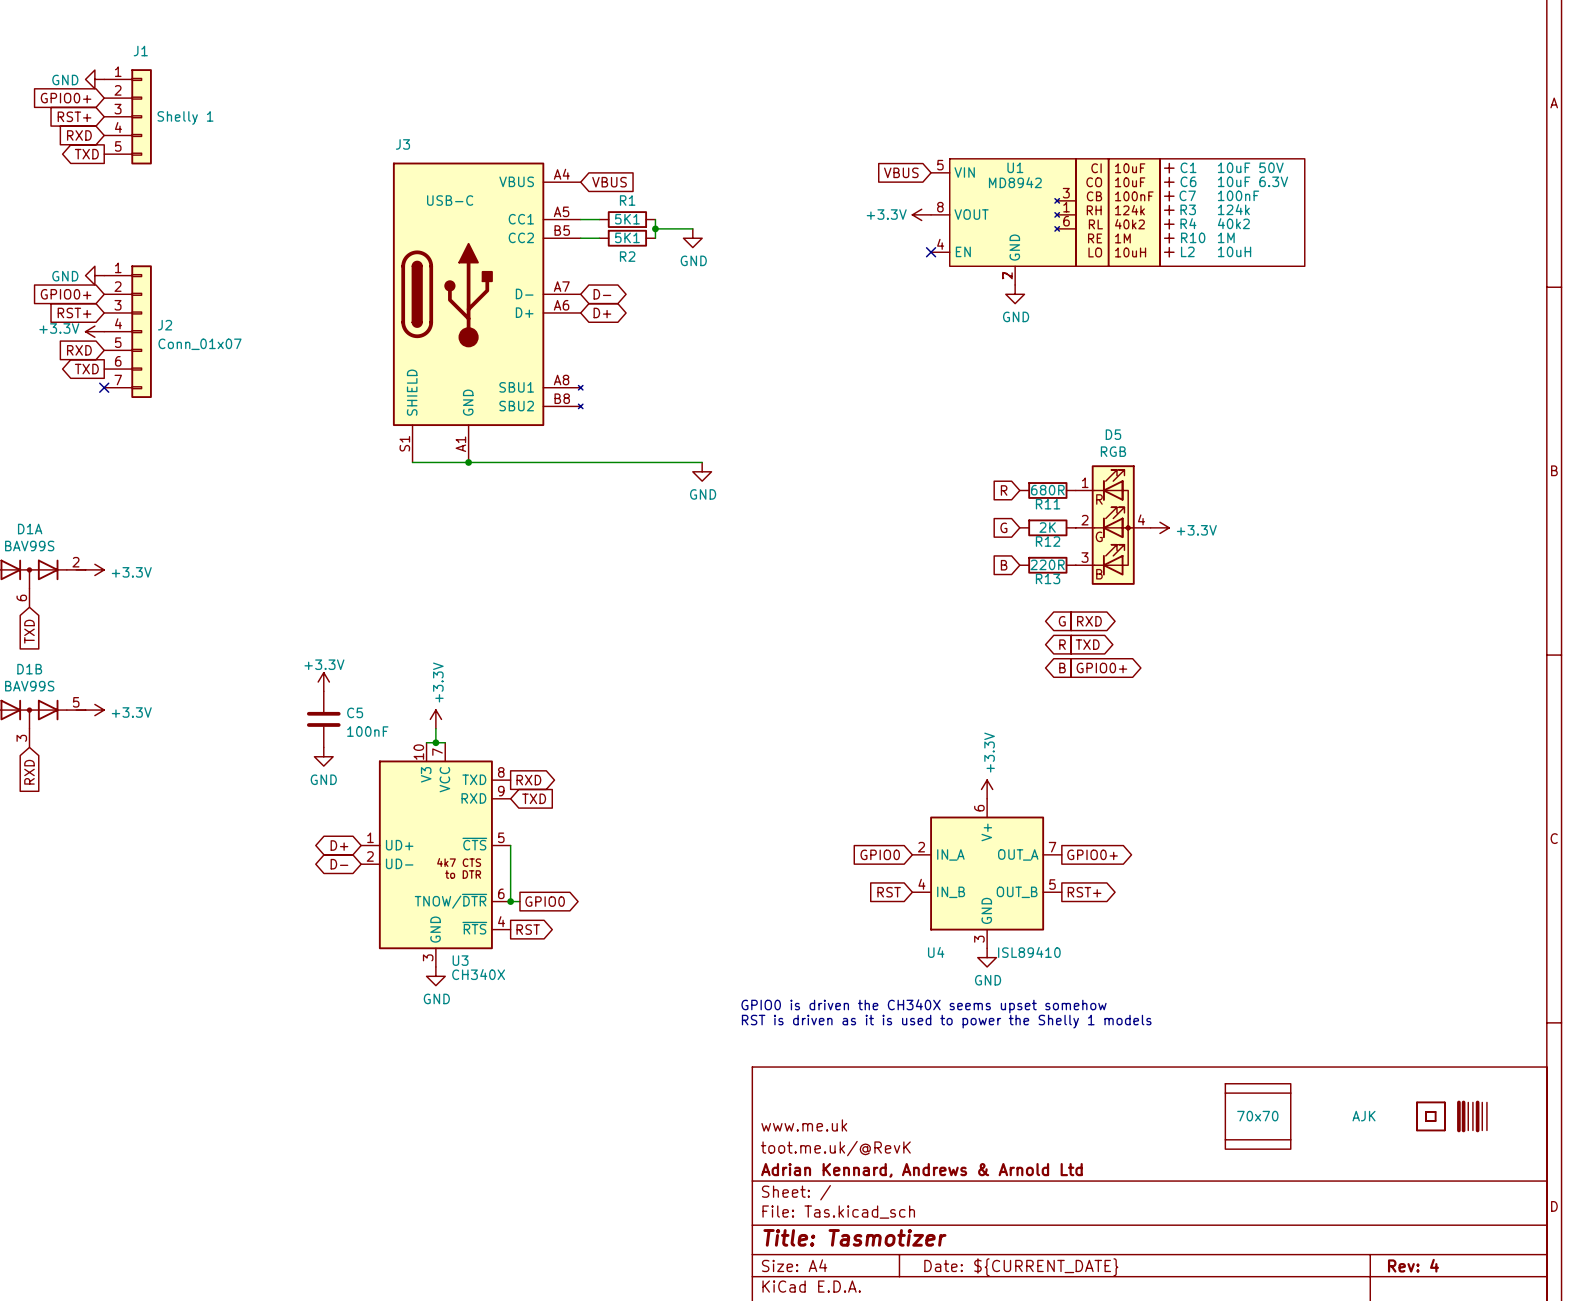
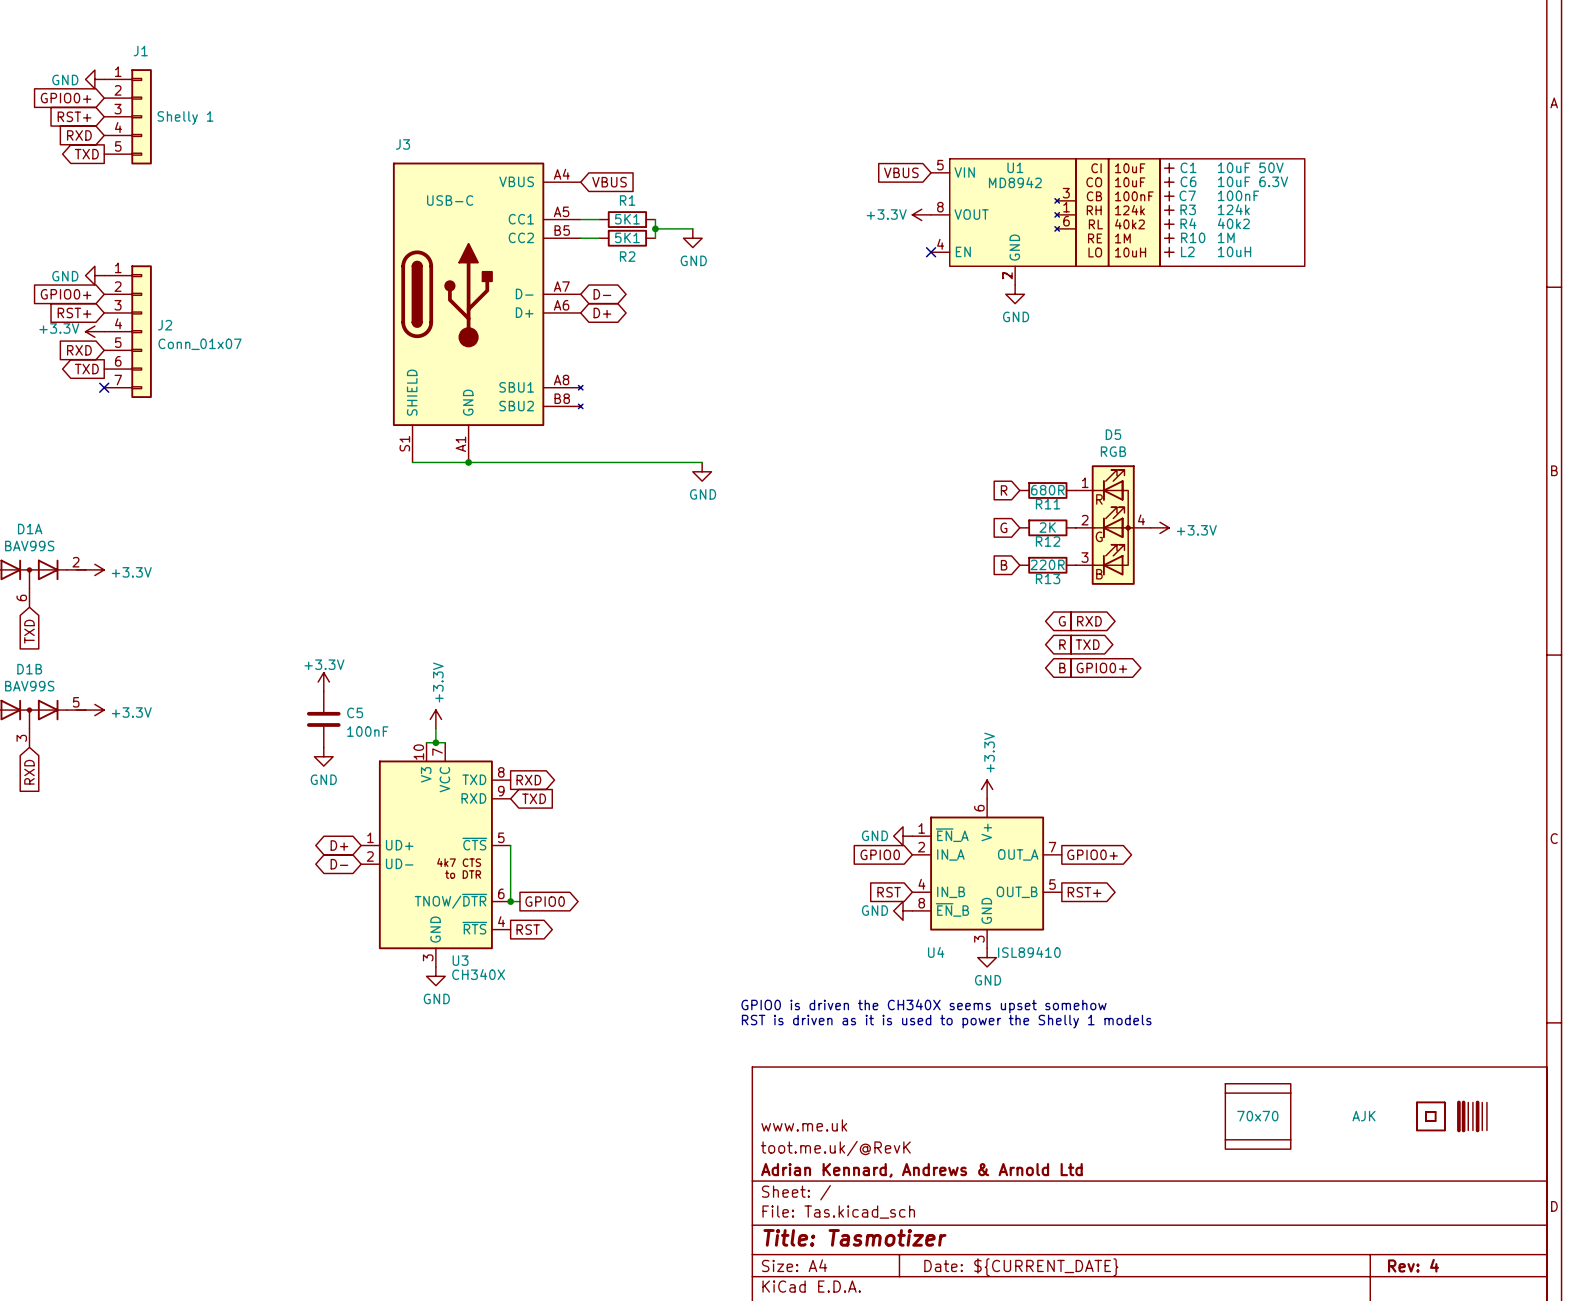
U4 symbol: [912, 798, 1062, 949] -> [912, 798, 1062, 949]
power symbol: none -> GND (903, 836)
power symbol: none -> GND (903, 910)

